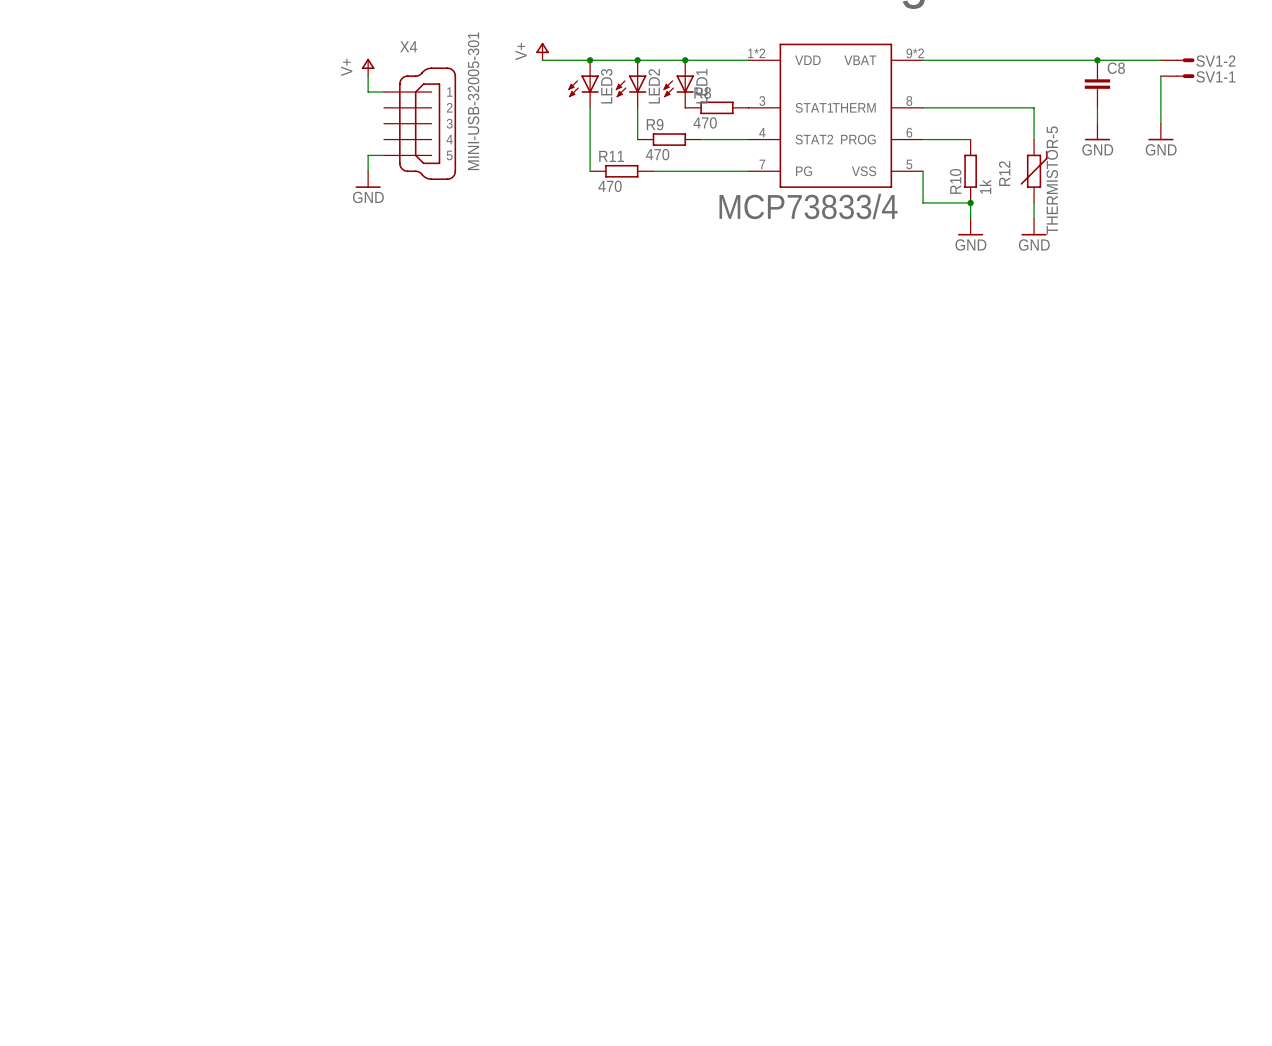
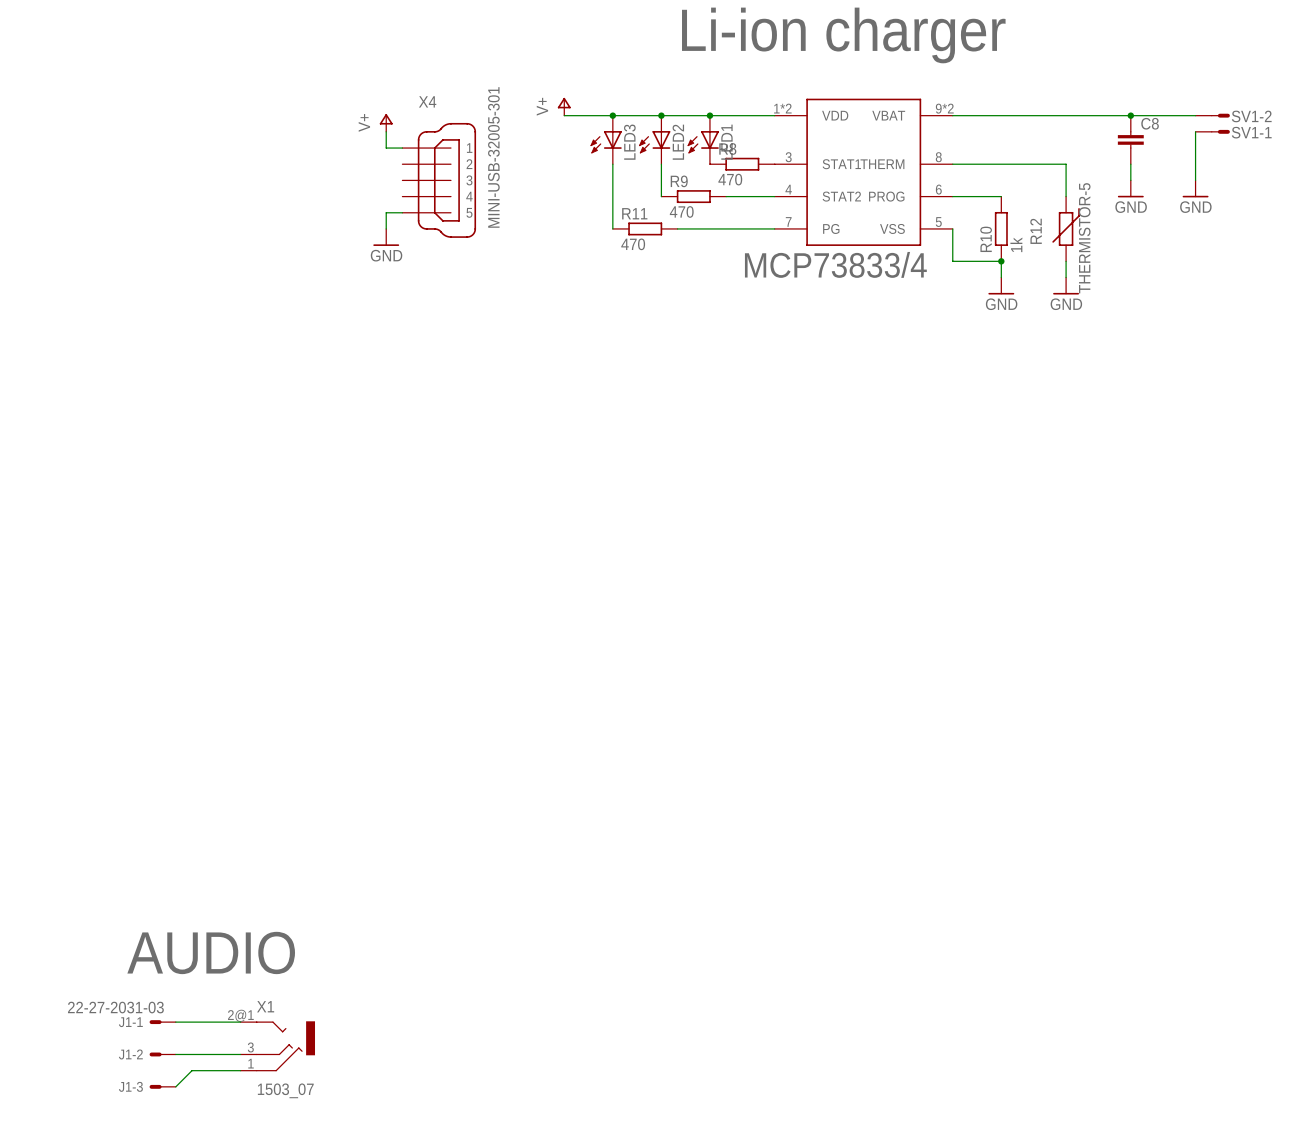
text: none -> AUDIO (211, 952)
J1-1: none -> 22-27-2031-03 (162, 1022)
wire: none -> (175, 1022) (240, 1022)
X1: none -> 1503_07 (277, 1046)
J1-2: none -> (162, 1054)
wire: none -> (175, 1054) (240, 1054)
wire: none -> (240, 1070) (191, 1070) (175, 1086)
J1-3: none -> (162, 1086)

